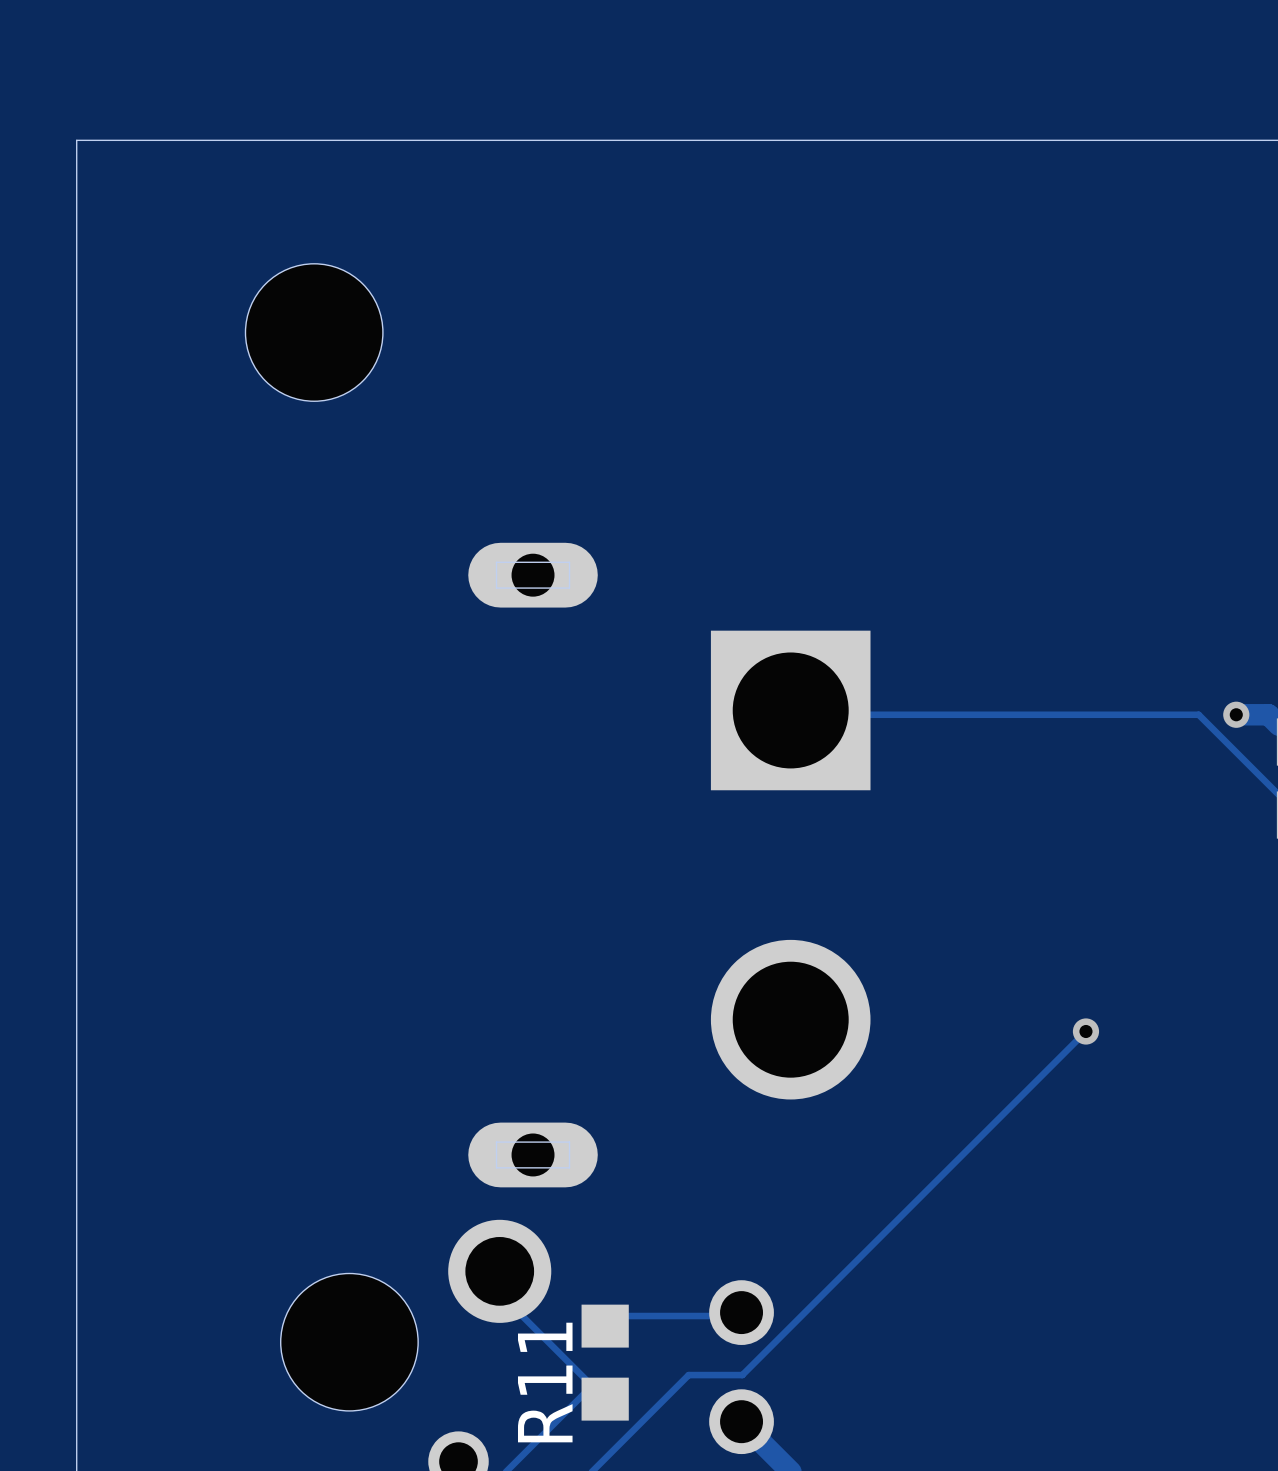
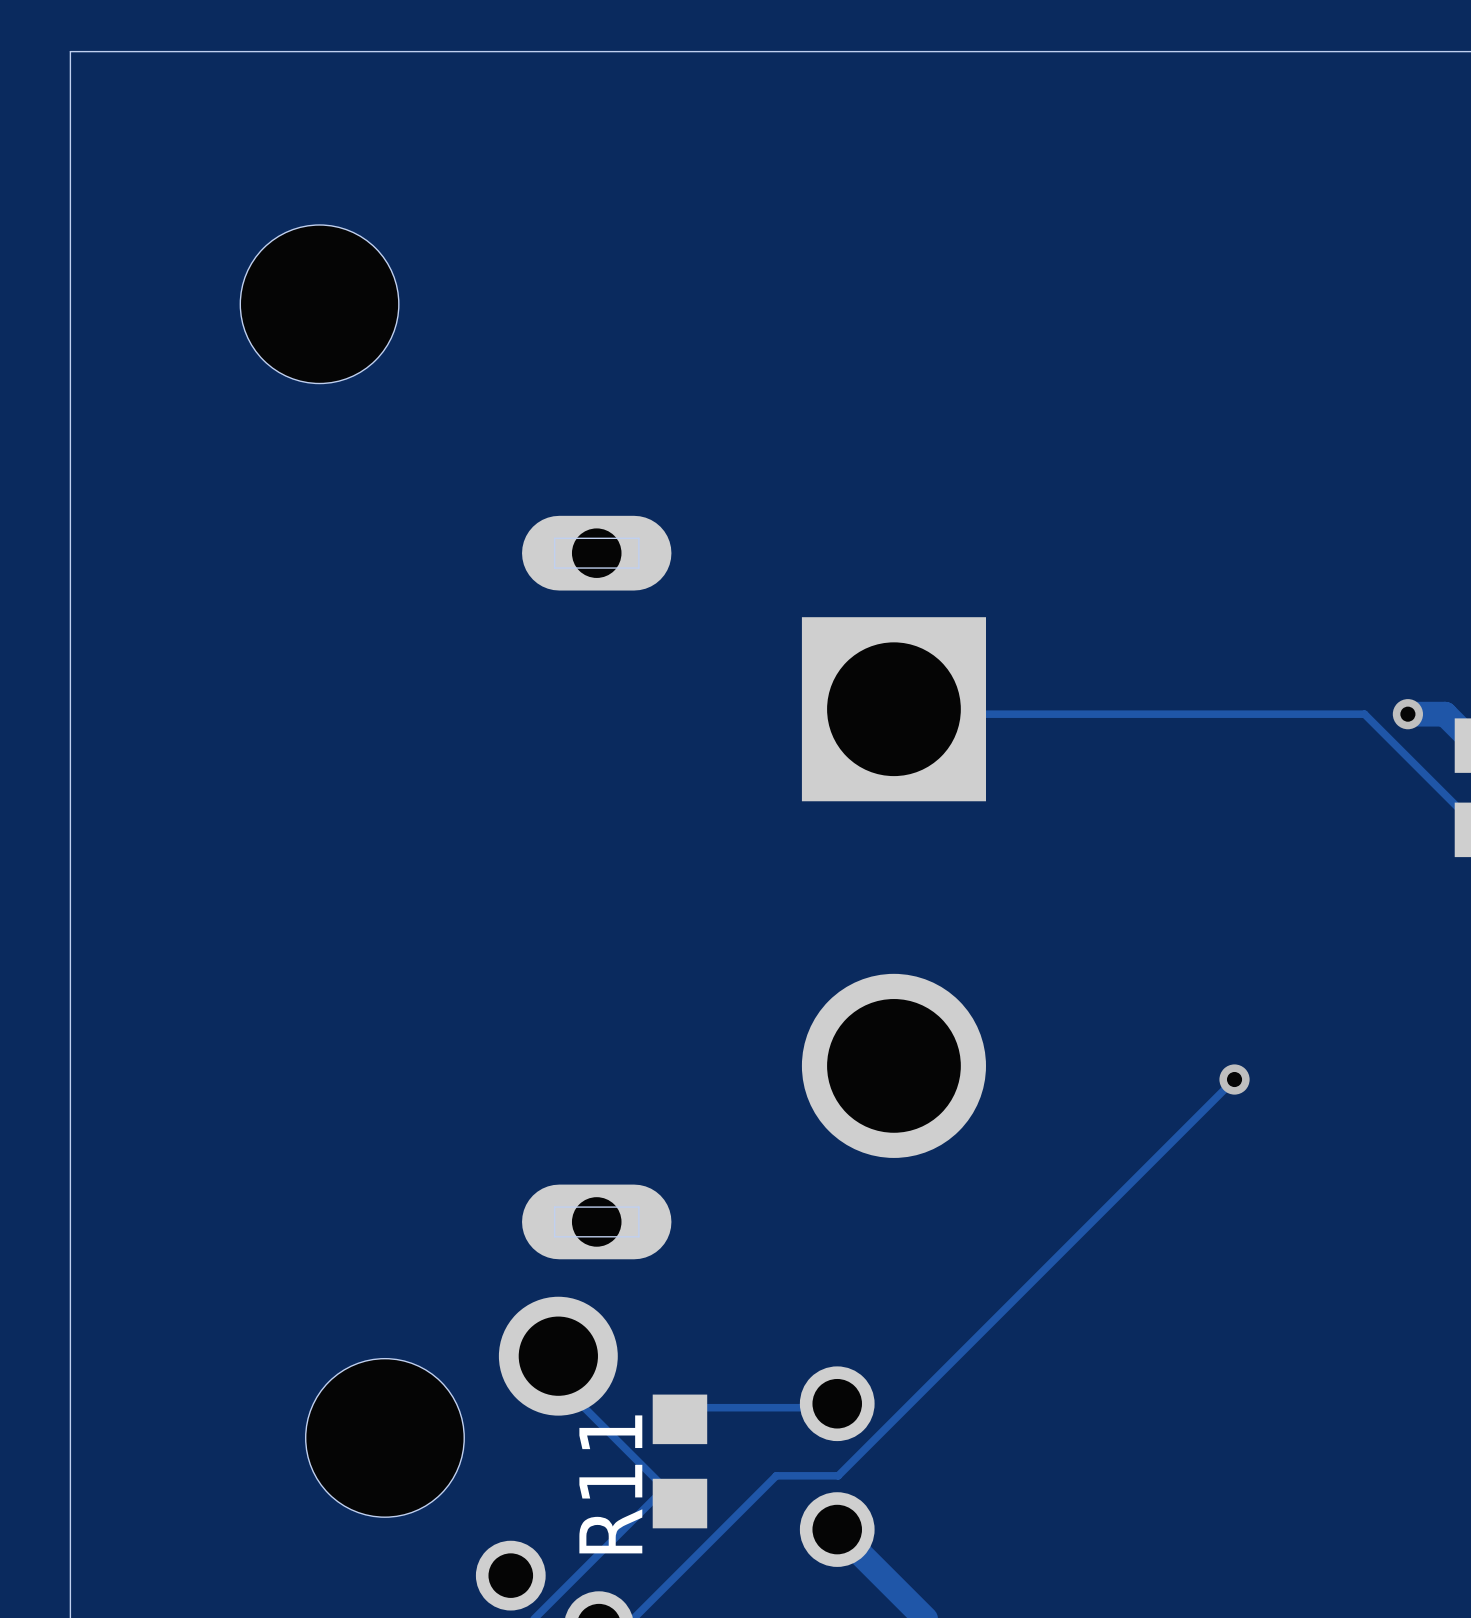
part position: (314, 332) -> (319, 304)

